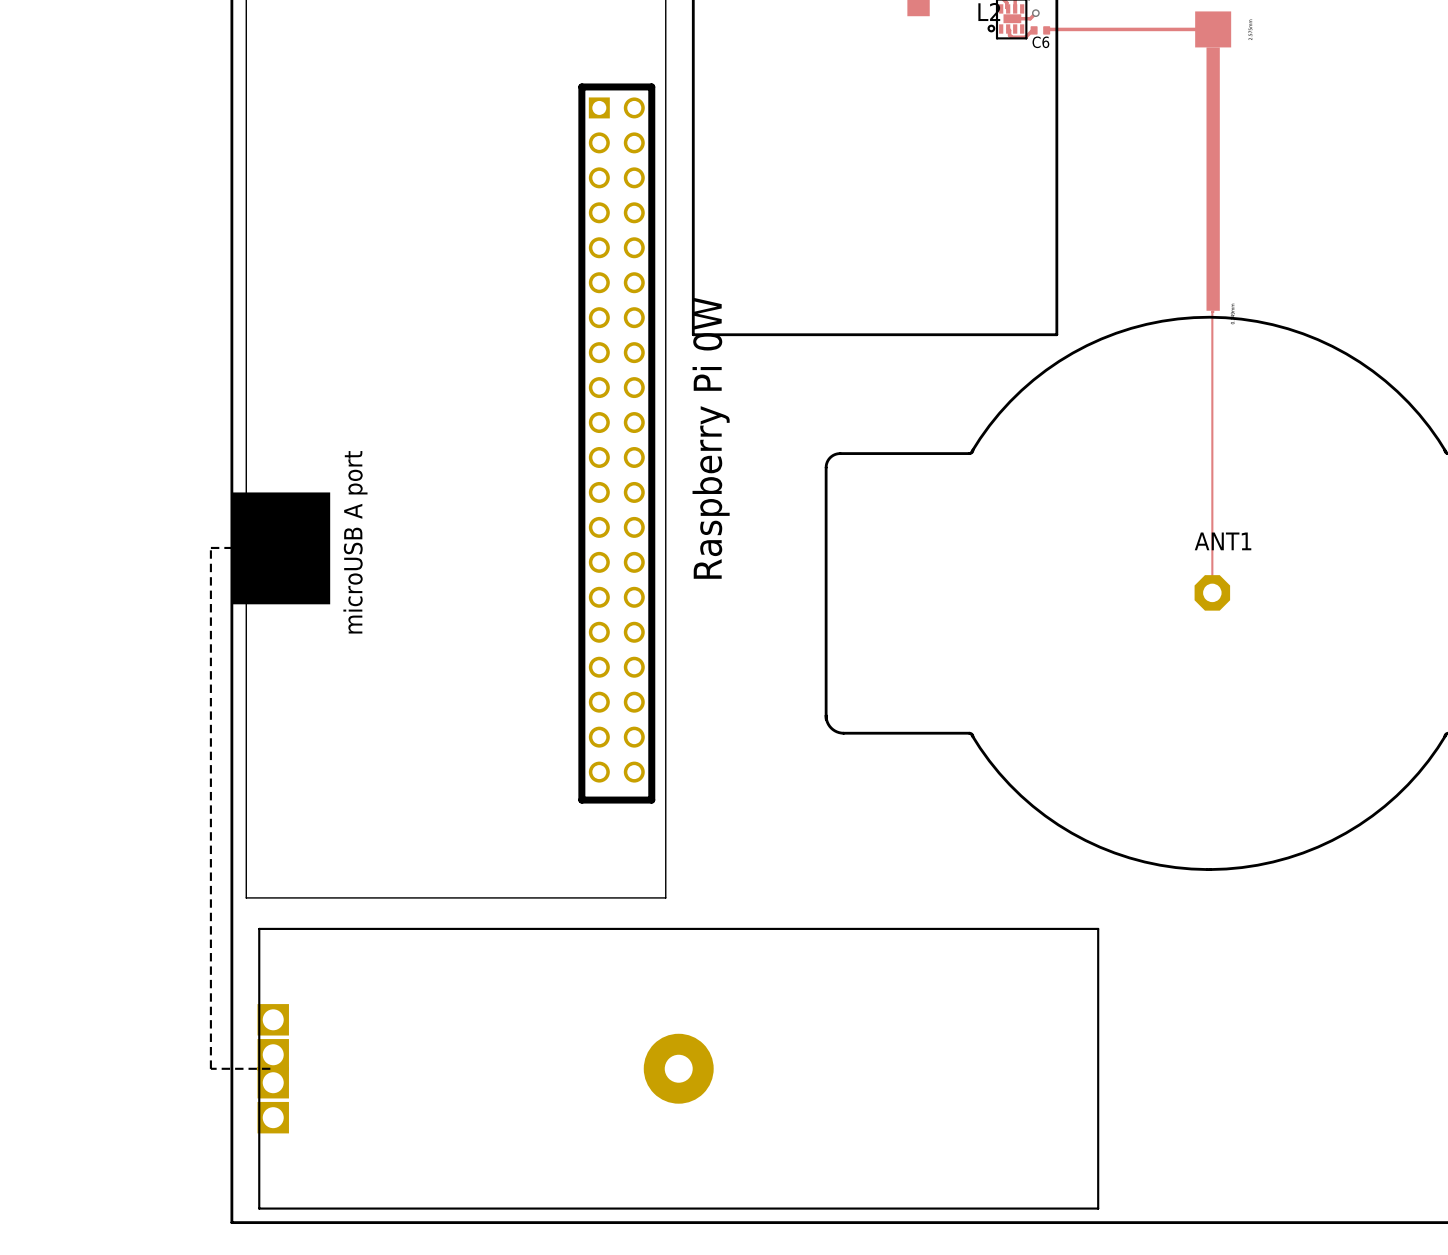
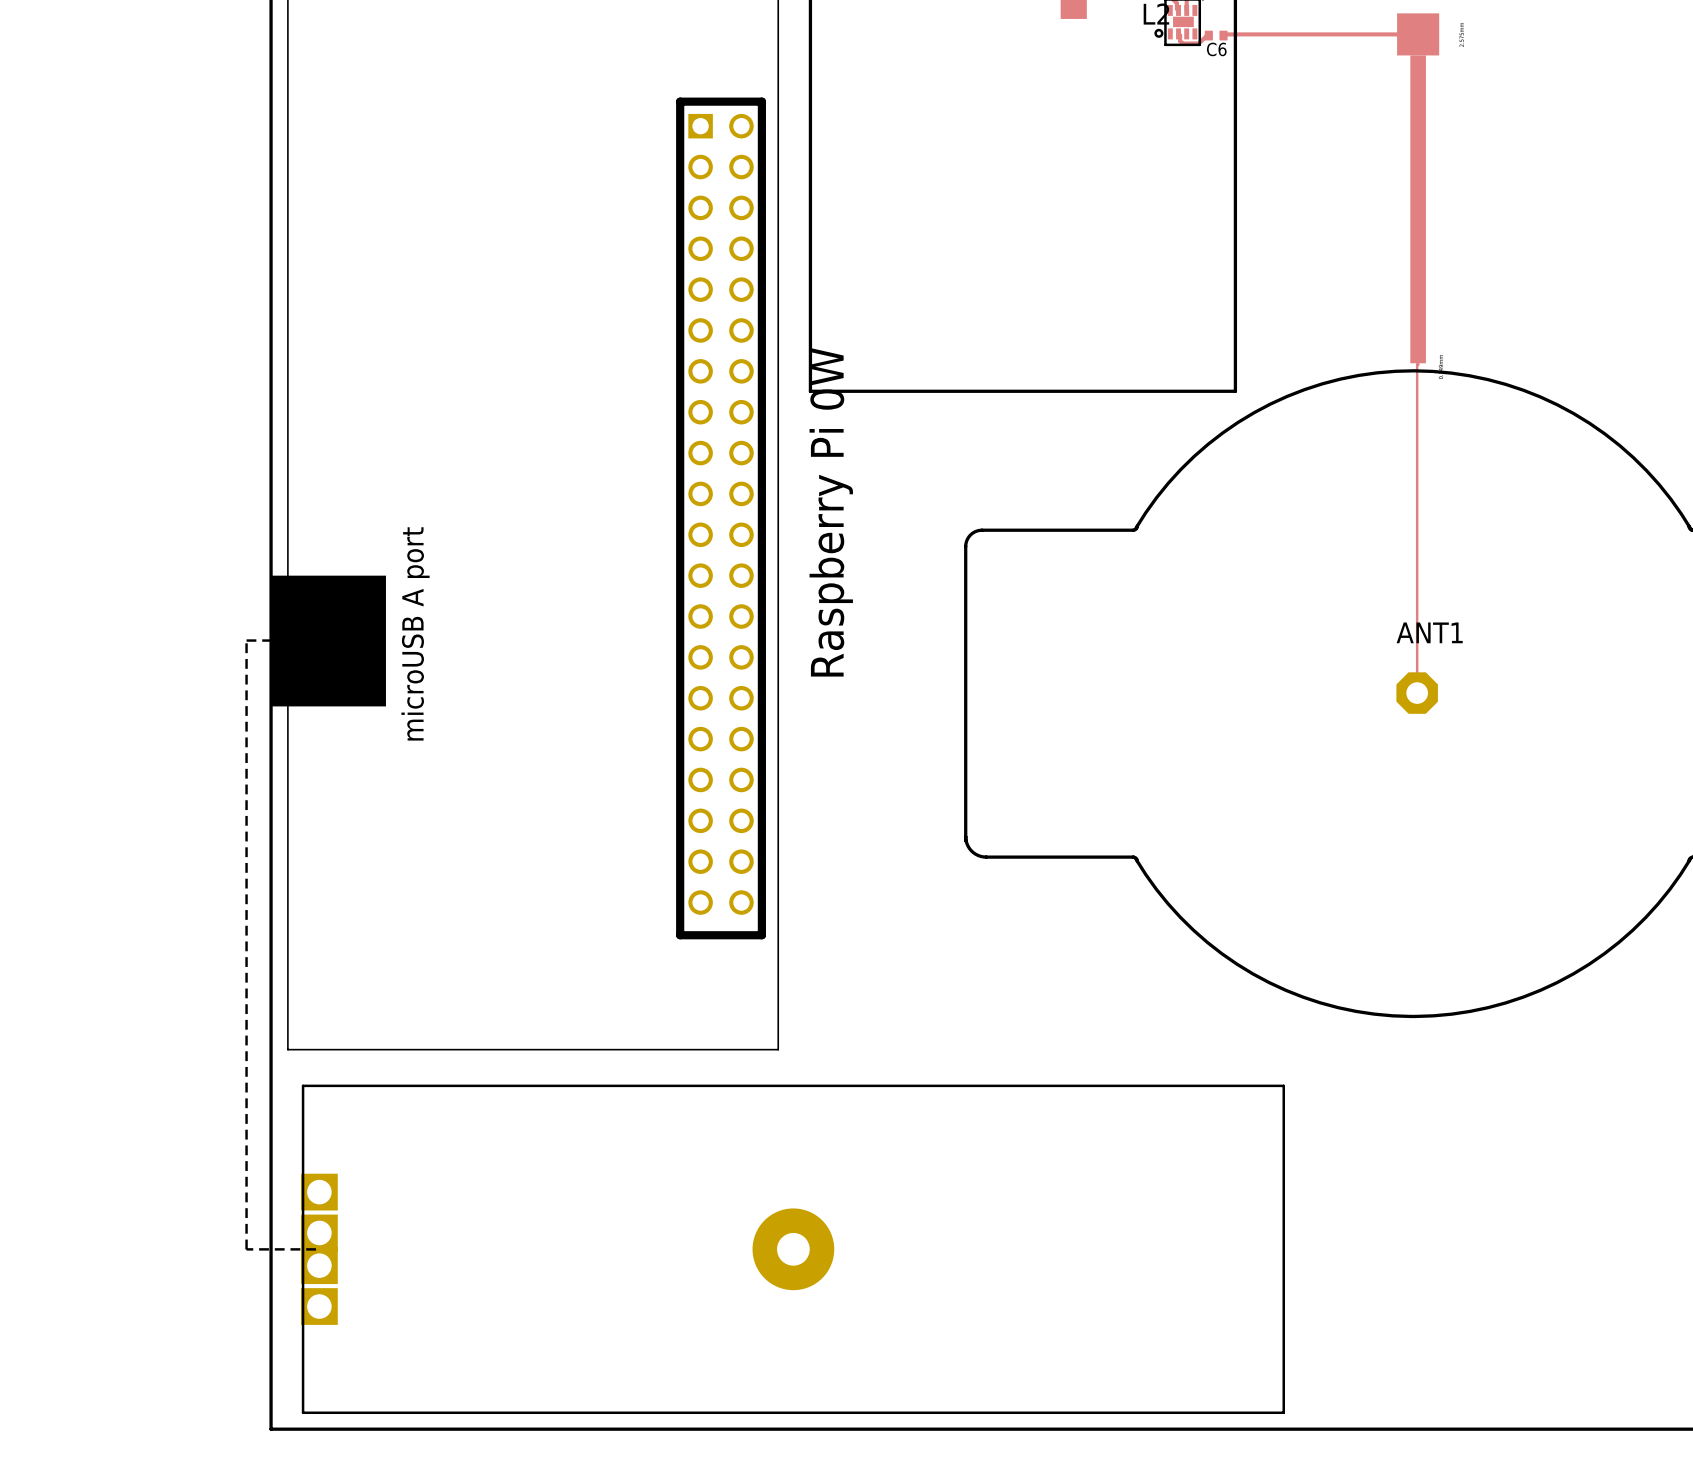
top track: (1035, 13) (1030, 18) (1012, 18) -> none
via: (1035, 13) -> none

